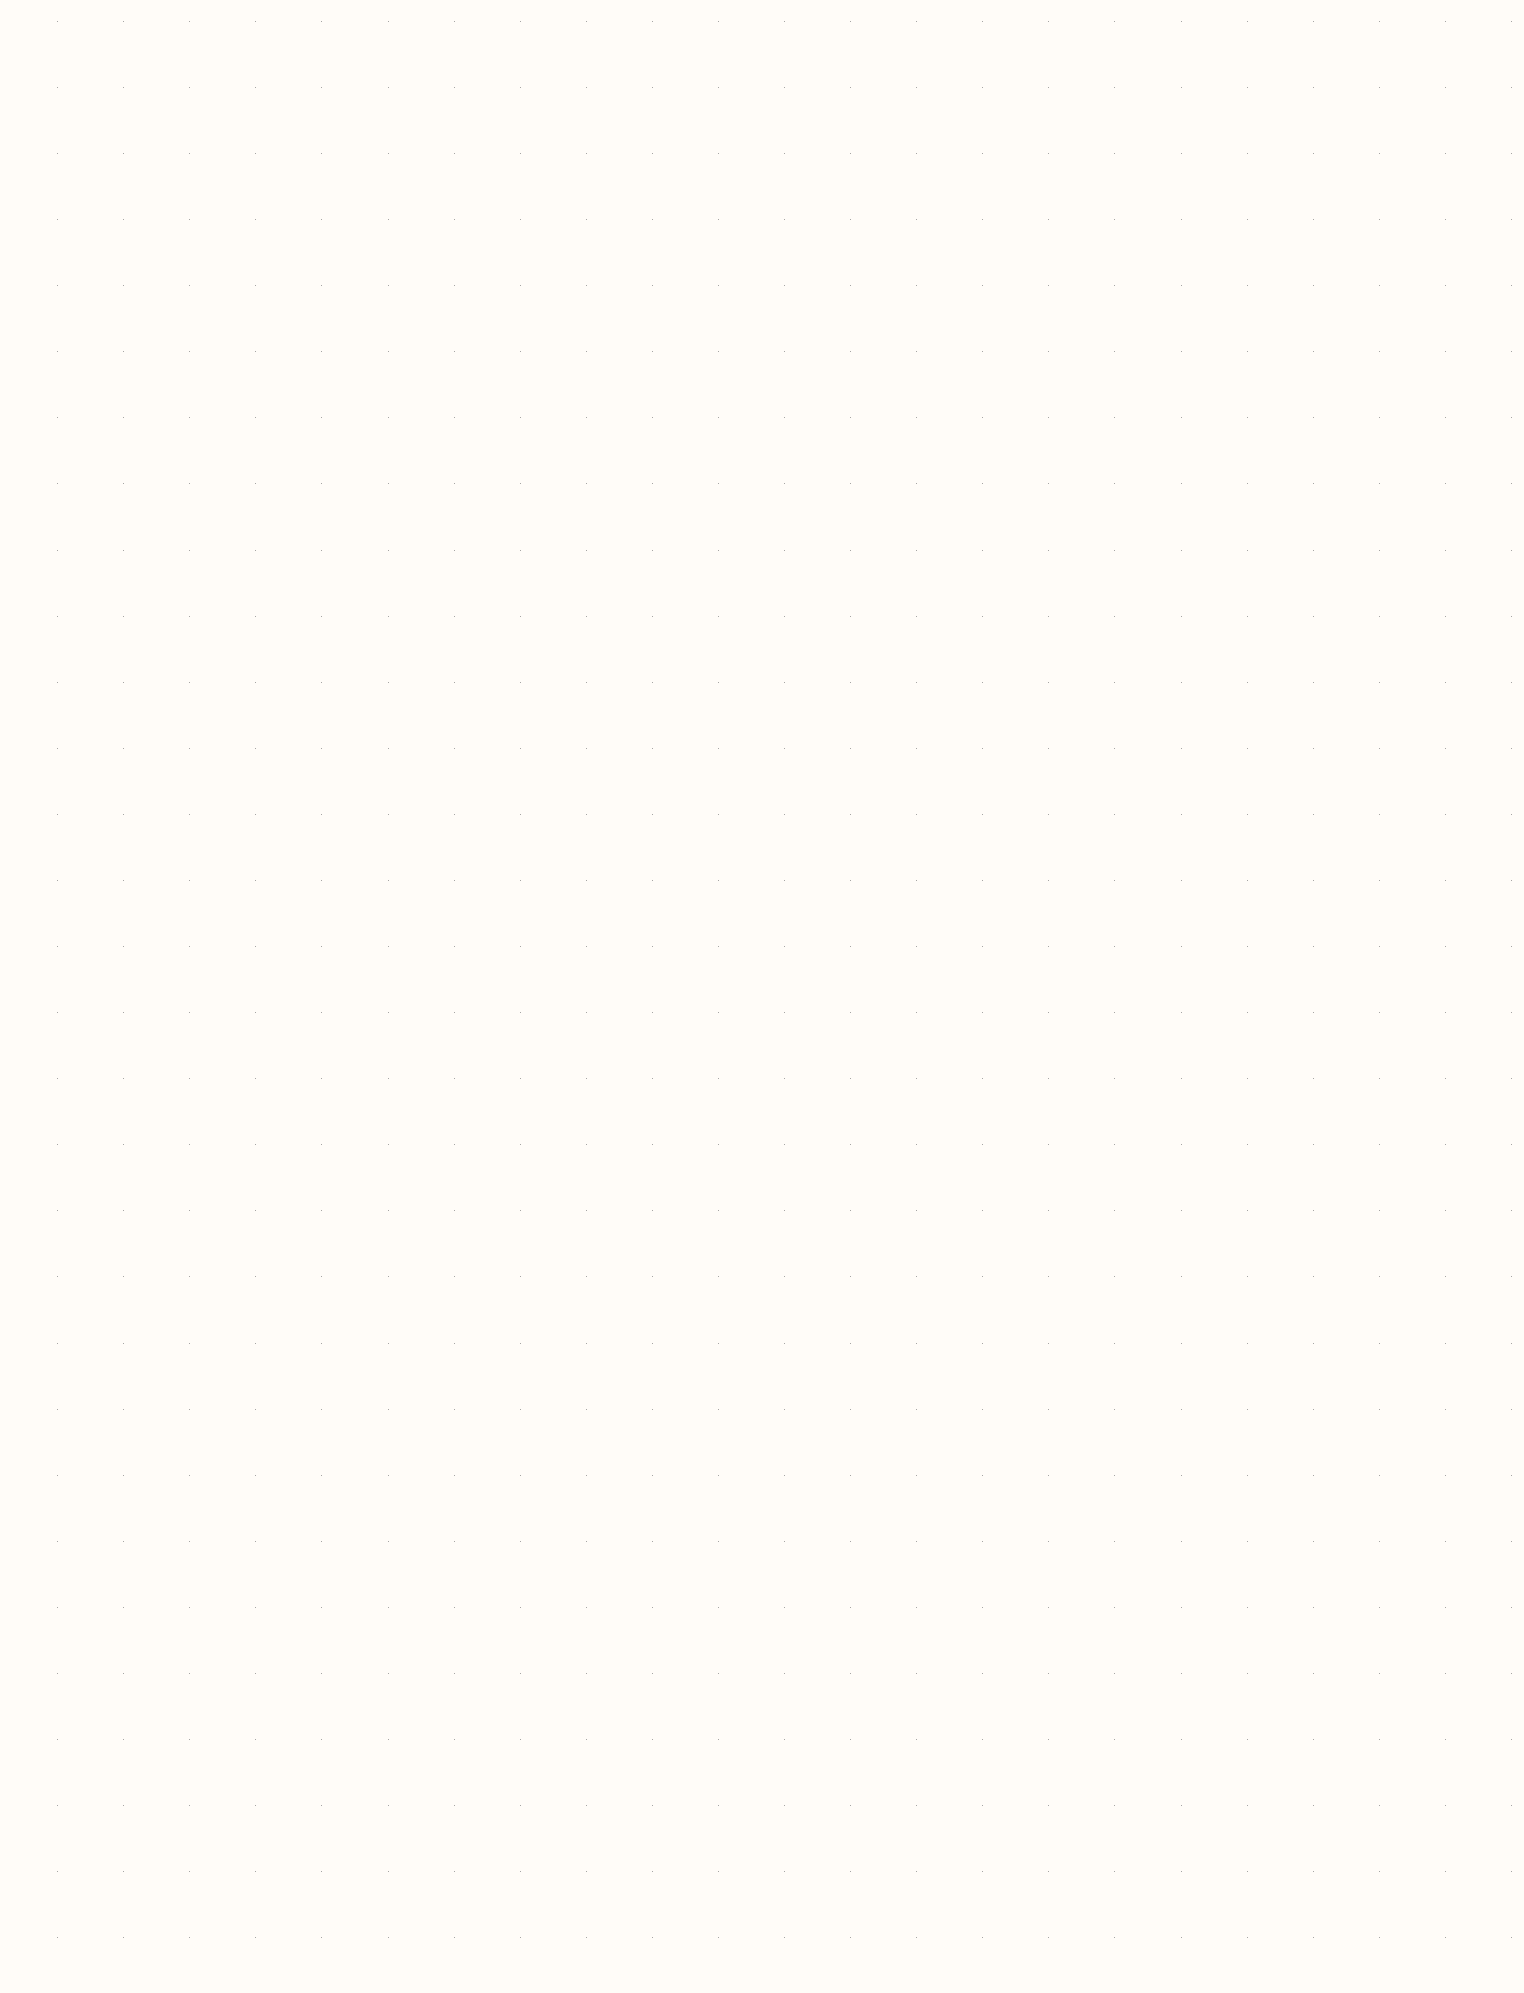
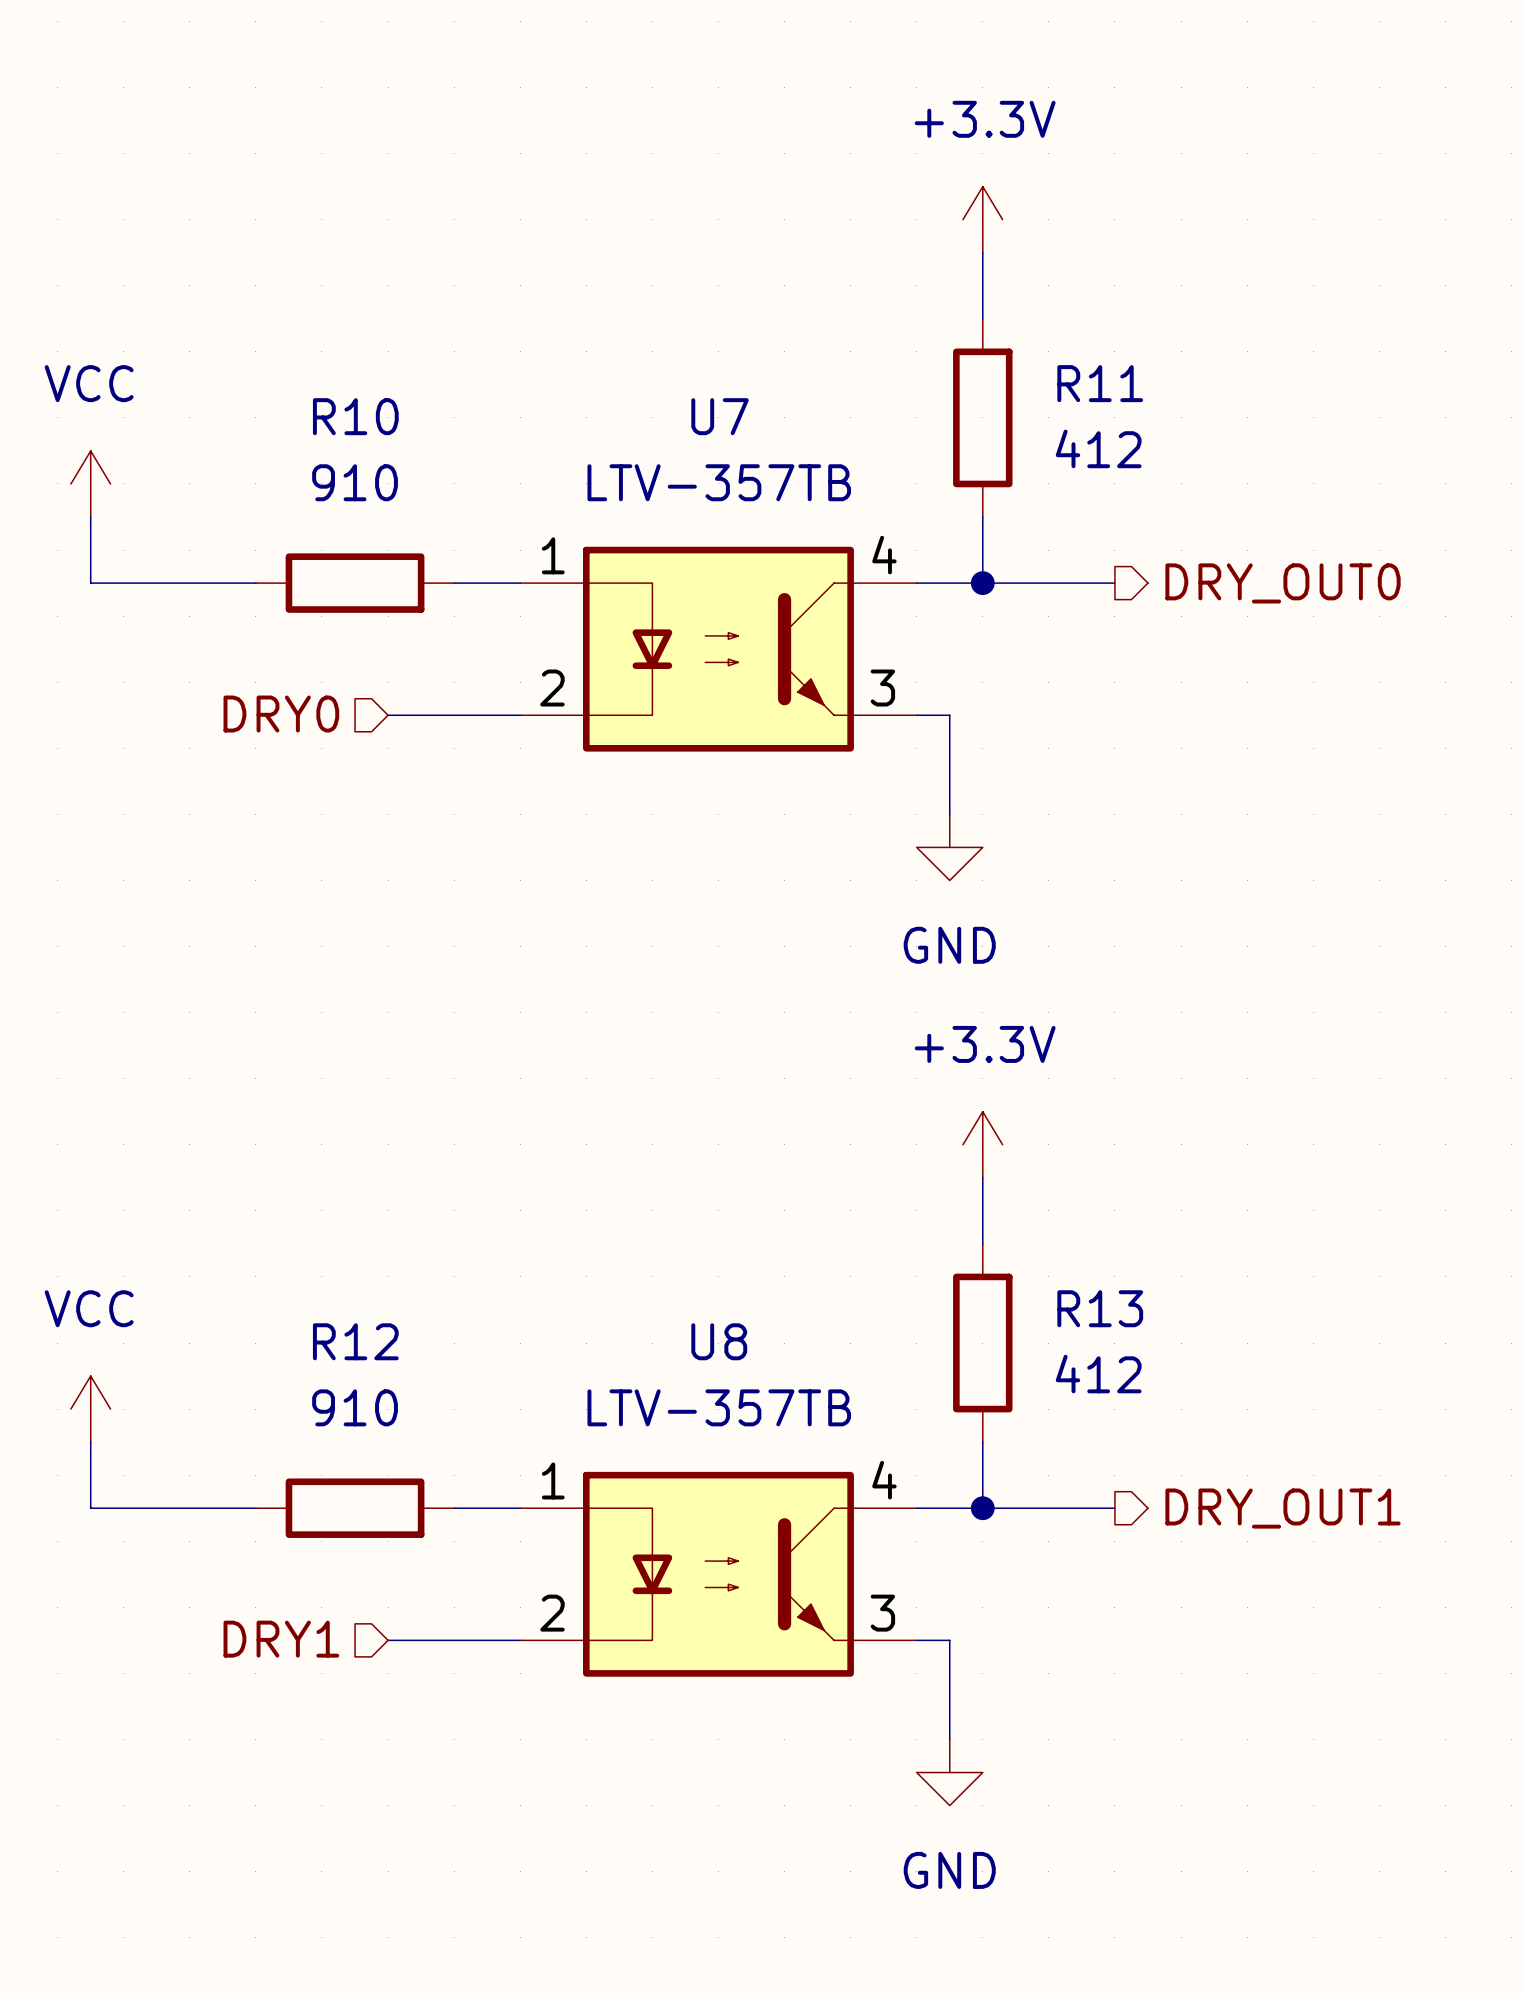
power symbol: none -> +3.3V (982, 219)
wire: none -> (982, 252) (982, 318)
R11: none -> 412 (982, 417)
power symbol: none -> VCC (90, 483)
wire: none -> (90, 517) (90, 583) (255, 583)
wire: none -> (982, 517) (982, 583)
R10: none -> 910 (355, 583)
wire: none -> (454, 583) (520, 583)
wire: none -> (916, 583) (1114, 583)
junction: none -> (982, 583)
hierarchical label: none -> DRY_OUT0 (1283, 583)
U7: none -> LTV-357TB (718, 649)
hierarchical label: none -> DRY0 (281, 714)
wire: none -> (388, 715) (520, 715)
wire: none -> (916, 715) (949, 715) (949, 814)
power symbol: none -> GND (949, 847)
power symbol: none -> +3.3V (982, 1144)
wire: none -> (982, 1177) (982, 1243)
R13: none -> 412 (982, 1343)
power symbol: none -> VCC (90, 1409)
wire: none -> (90, 1442) (90, 1508) (255, 1508)
wire: none -> (982, 1442) (982, 1508)
R12: none -> 910 (355, 1508)
wire: none -> (454, 1508) (520, 1508)
wire: none -> (916, 1508) (1114, 1508)
junction: none -> (982, 1508)
hierarchical label: none -> DRY_OUT1 (1283, 1508)
U8: none -> LTV-357TB (718, 1574)
hierarchical label: none -> DRY1 (281, 1639)
wire: none -> (388, 1640) (520, 1640)
wire: none -> (916, 1640) (949, 1640) (949, 1739)
power symbol: none -> GND (949, 1772)

